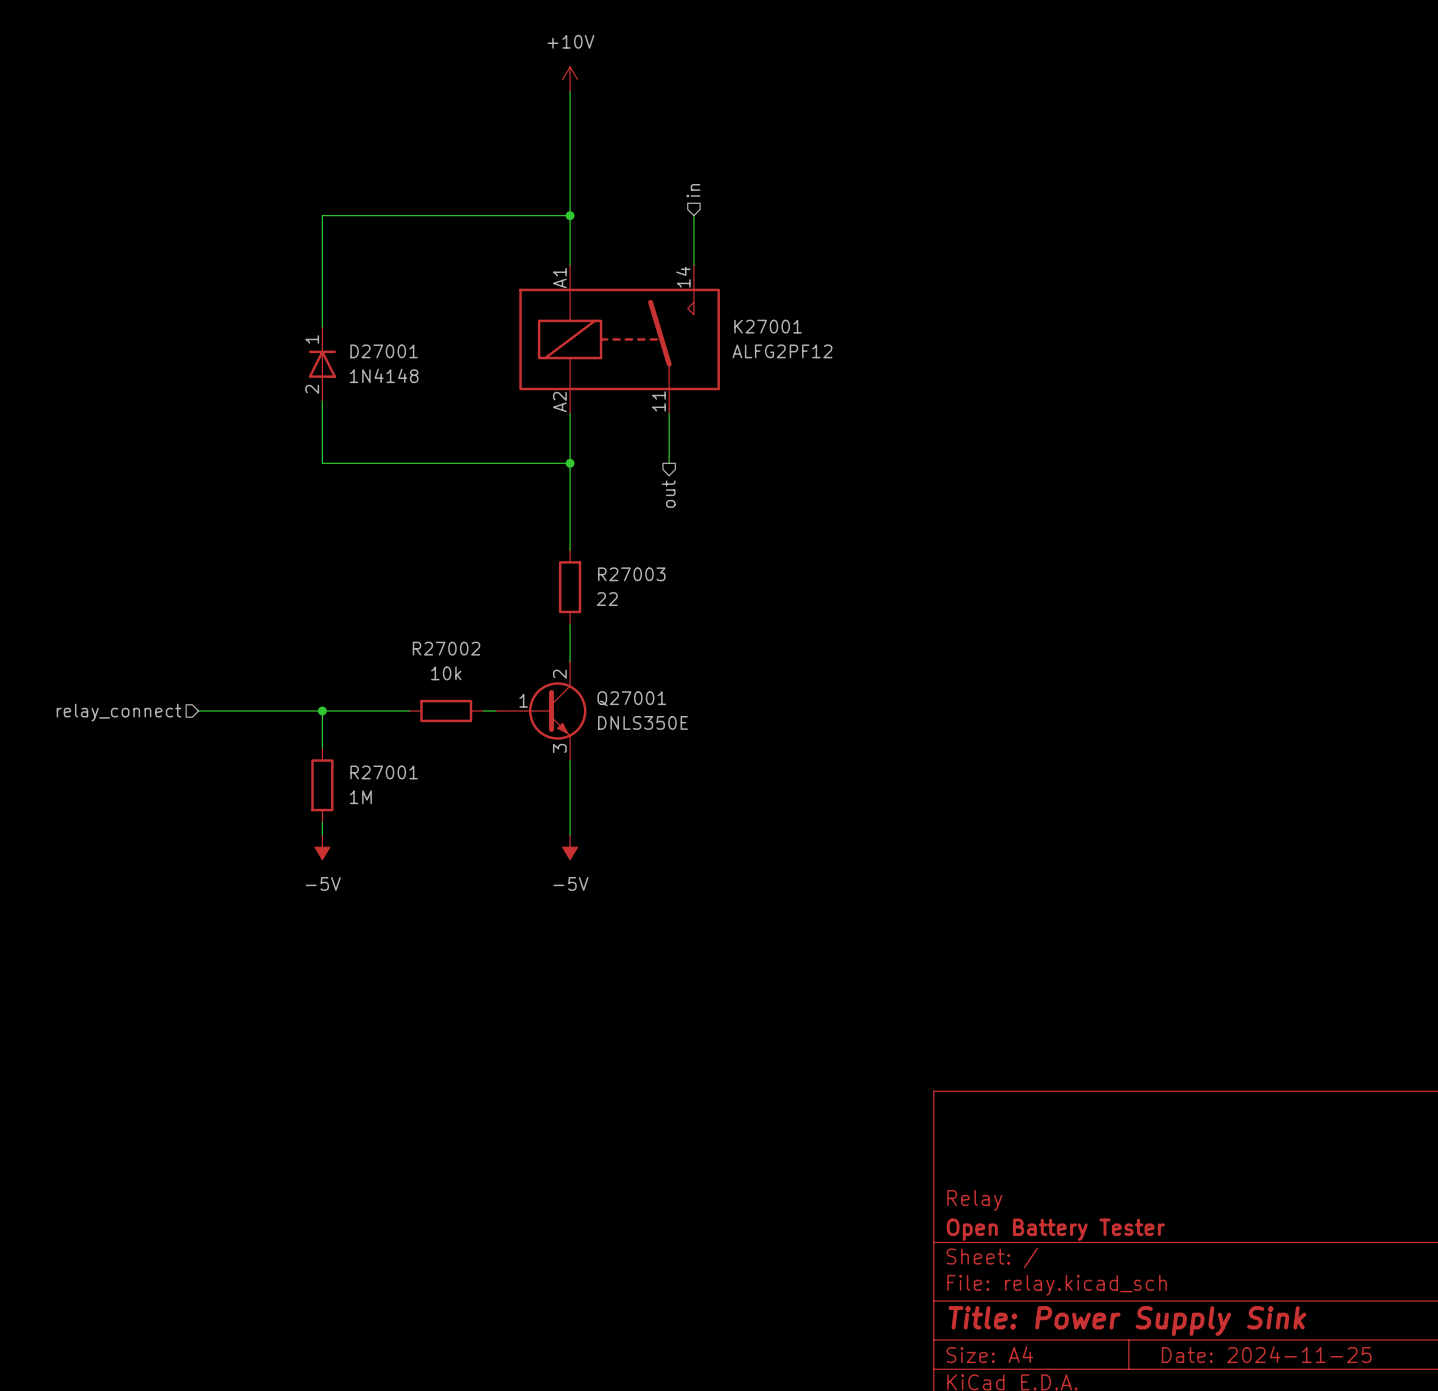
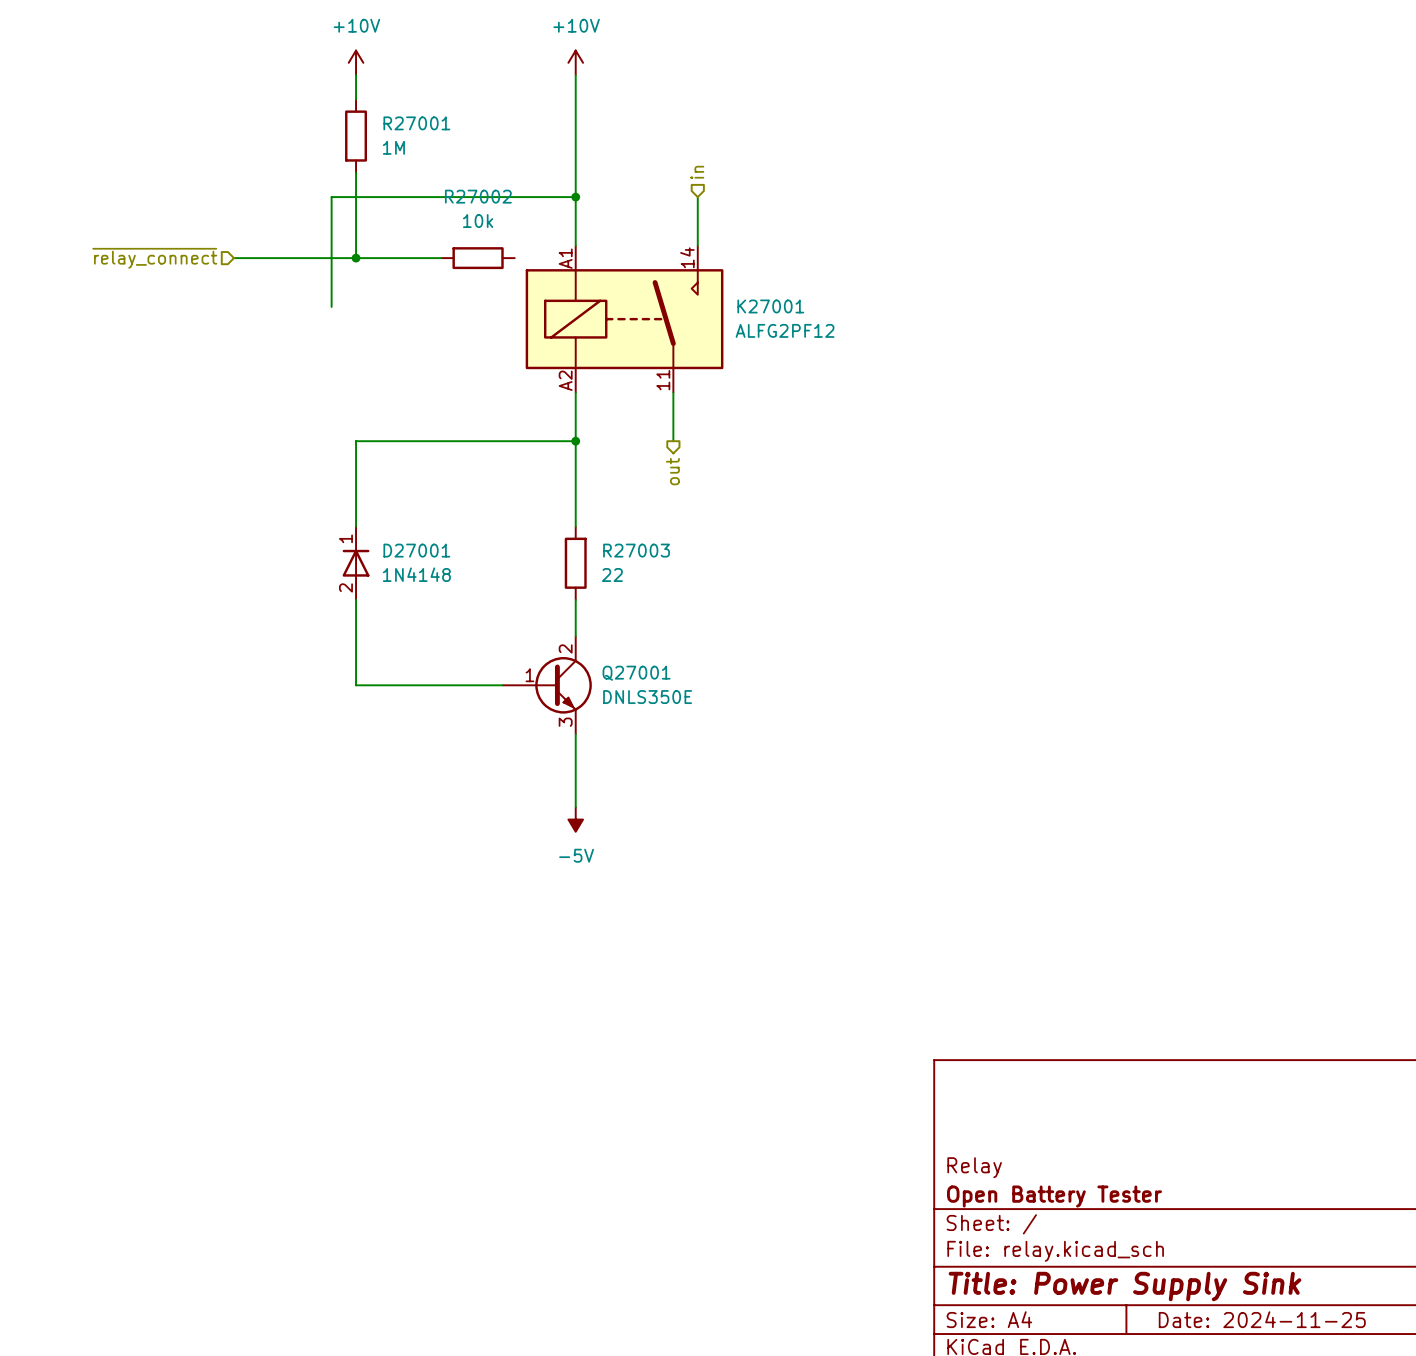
power symbol: none -> +10V (356, 62)
wire: none -> (356, 75) (356, 99)
wire: none -> (356, 172) (356, 258)
hierarchical label: none -> ~{relay_connect} (154, 258)
wire: none -> (233, 258) (441, 258)
junction: none -> (356, 258)
D27001 position: (322, 364) -> (356, 563)
wire: (322, 401) (322, 463) (347, 463) -> (356, 526) (356, 441)
wire: (198, 711) (347, 711) -> (356, 599) (356, 685)
wire: (322, 711) (322, 748) -> none
junction: (322, 711) -> none
wire: none -> (417, 685) (490, 685)
R27002 position: (446, 711) -> (478, 258)
hierarchical label: relay_connect (119, 712) -> none
R27001 position: (322, 785) -> (356, 136)
wire: (322, 822) (322, 834) -> none
power symbol: -5V (322, 847) -> none

